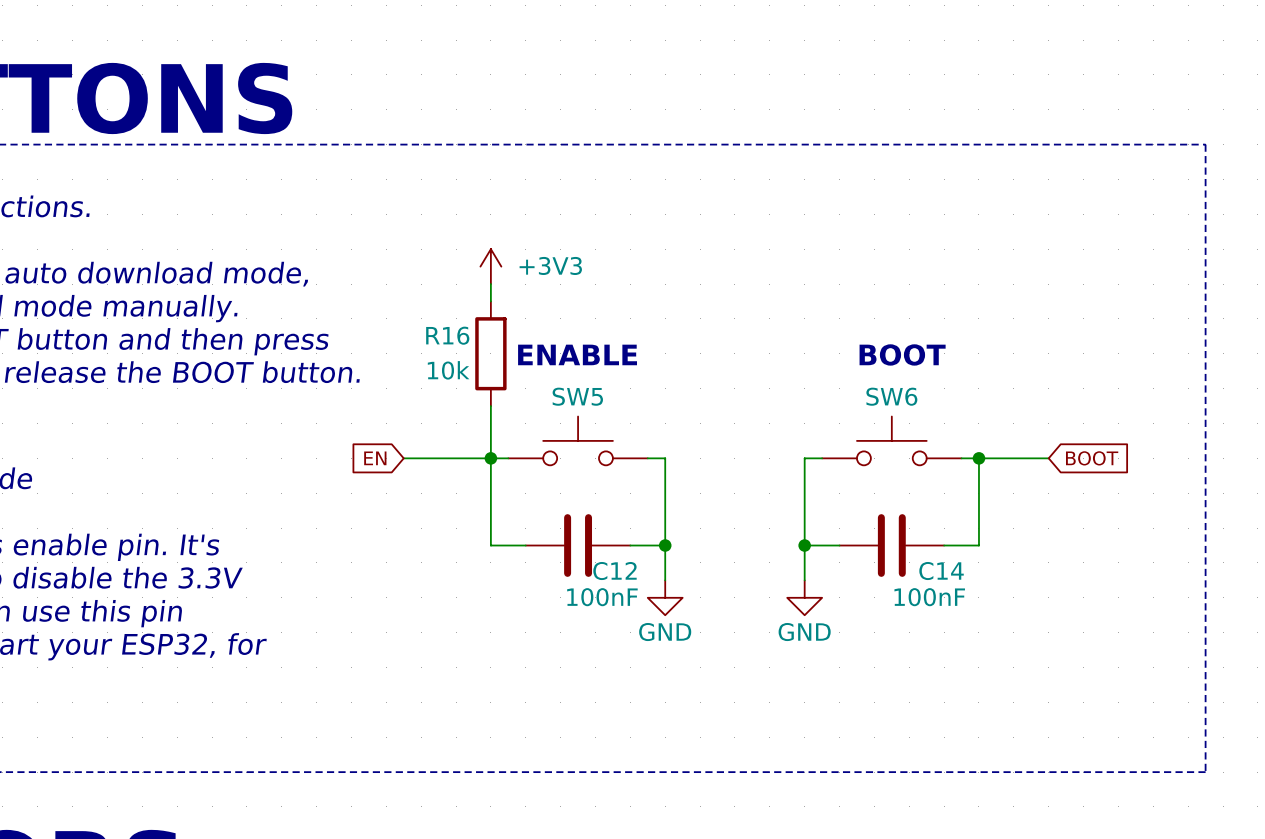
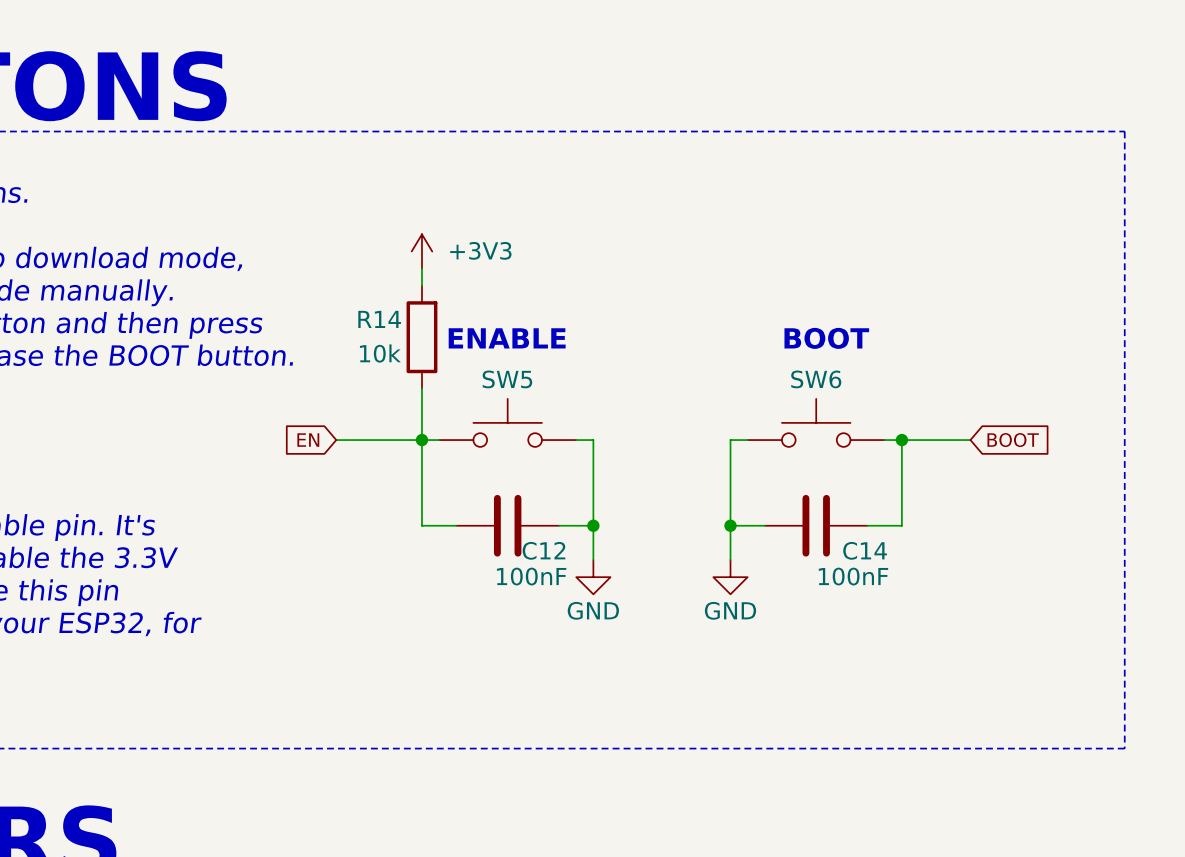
R16 name: R16 (447, 335) -> R14 (379, 319)

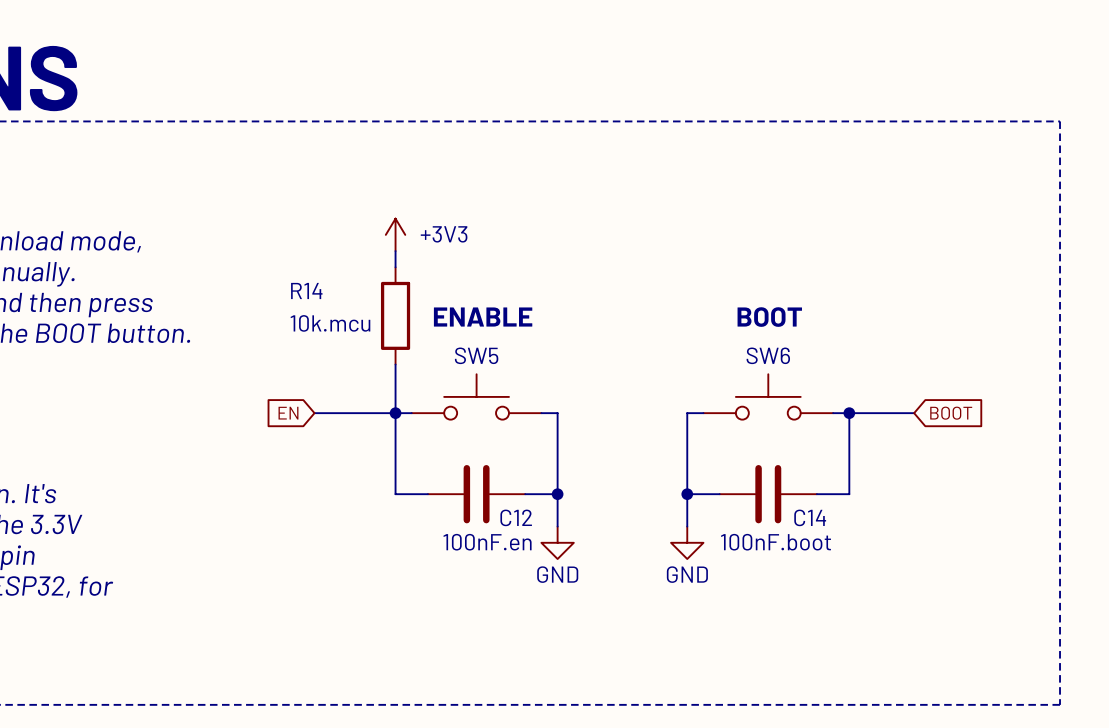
R14 name position: R14 (379, 319) -> R14 (306, 290)
R14 value: 10k (380, 353) -> 10k.mcu (330, 323)
C12 value: 100nF (531, 576) -> 100nF.en (487, 542)
C14 value: 100nF (853, 576) -> 100nF.boot (776, 542)

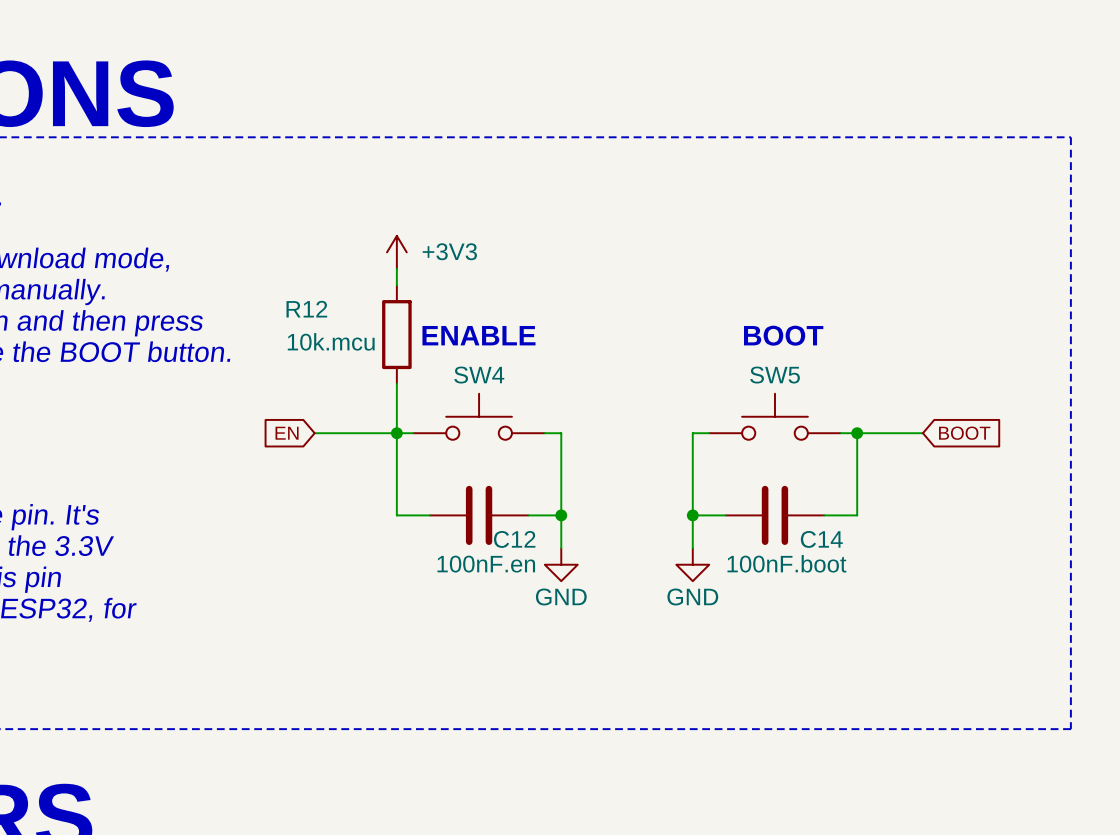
R14 name: R14 (306, 290) -> R12 (306, 309)
SW5 name: SW5 (476, 355) -> SW4 (479, 375)
SW6 name: SW6 (768, 355) -> SW5 (775, 375)

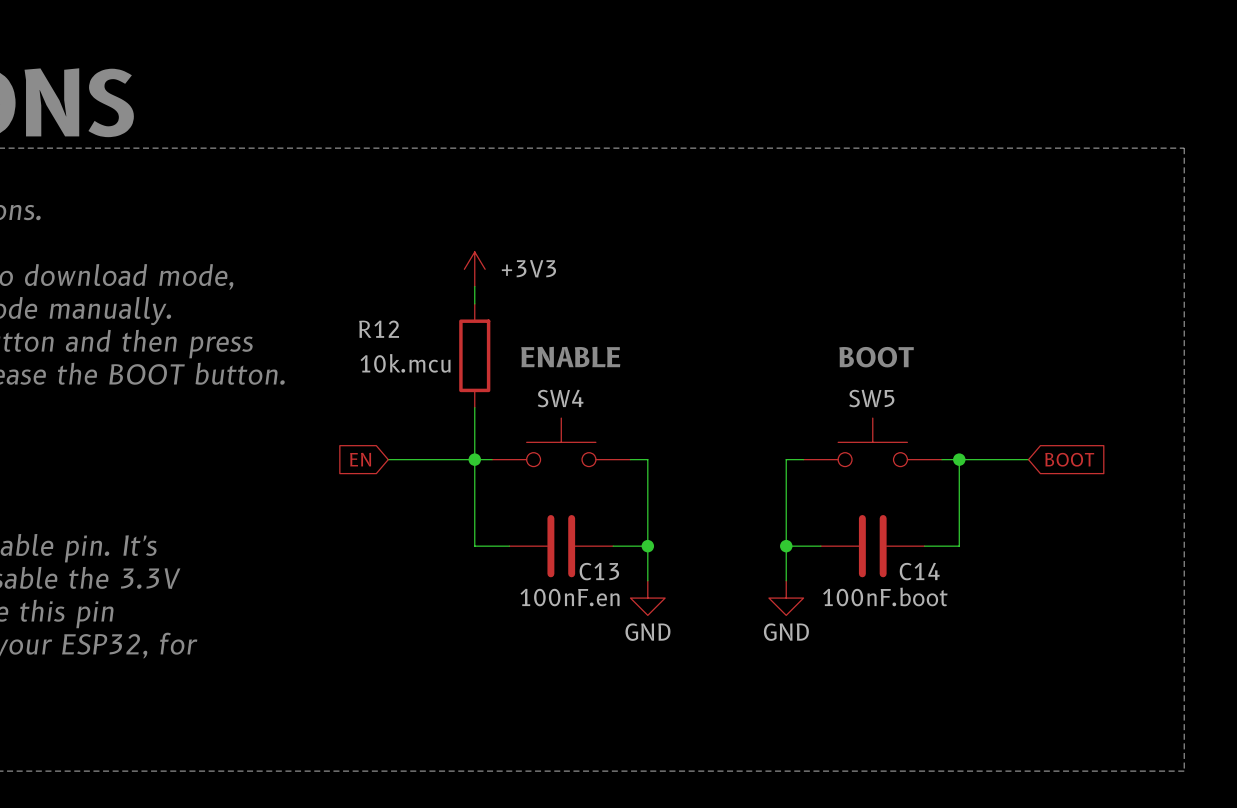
C12 name: C12 (514, 539) -> C13 (599, 571)

